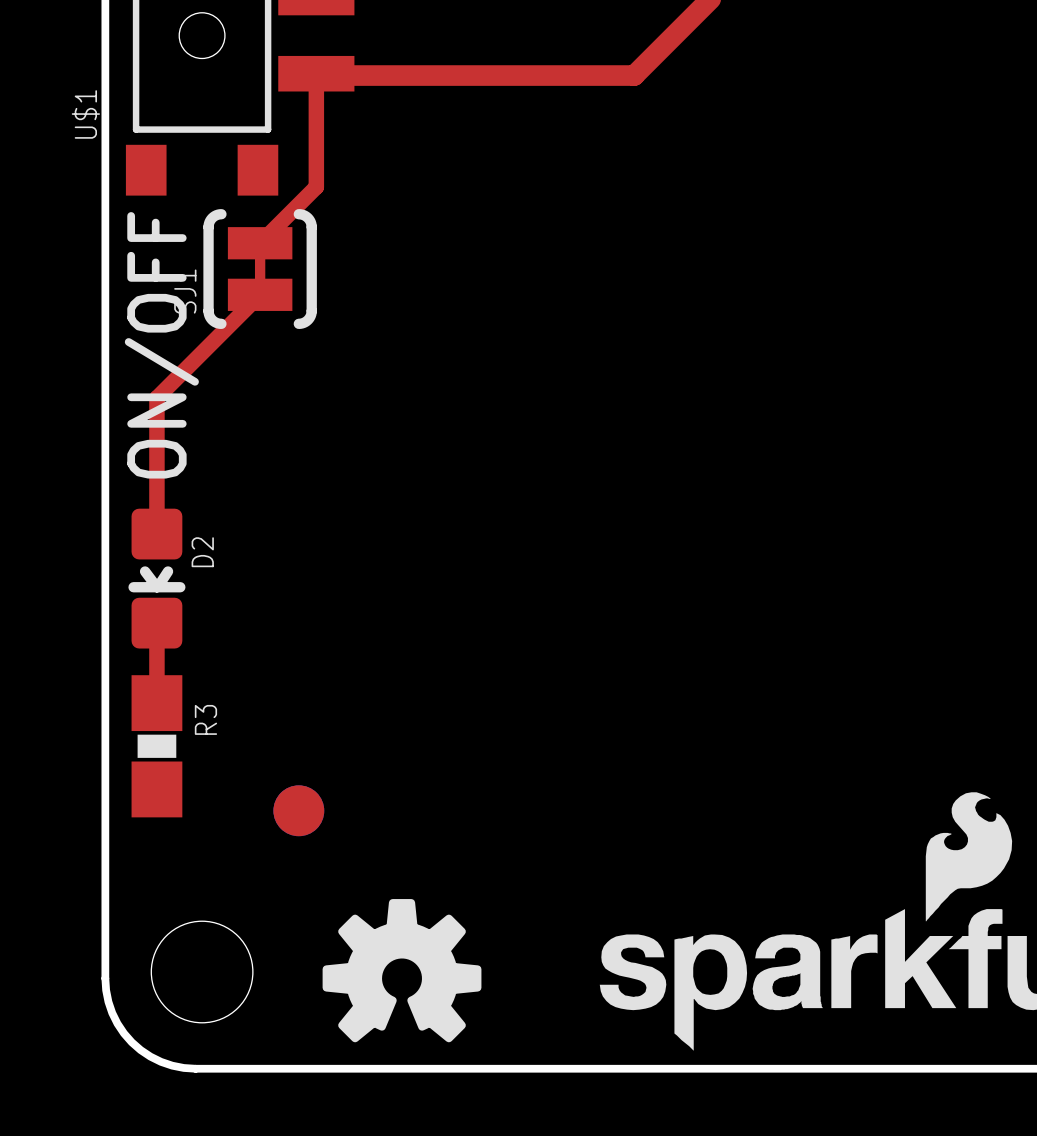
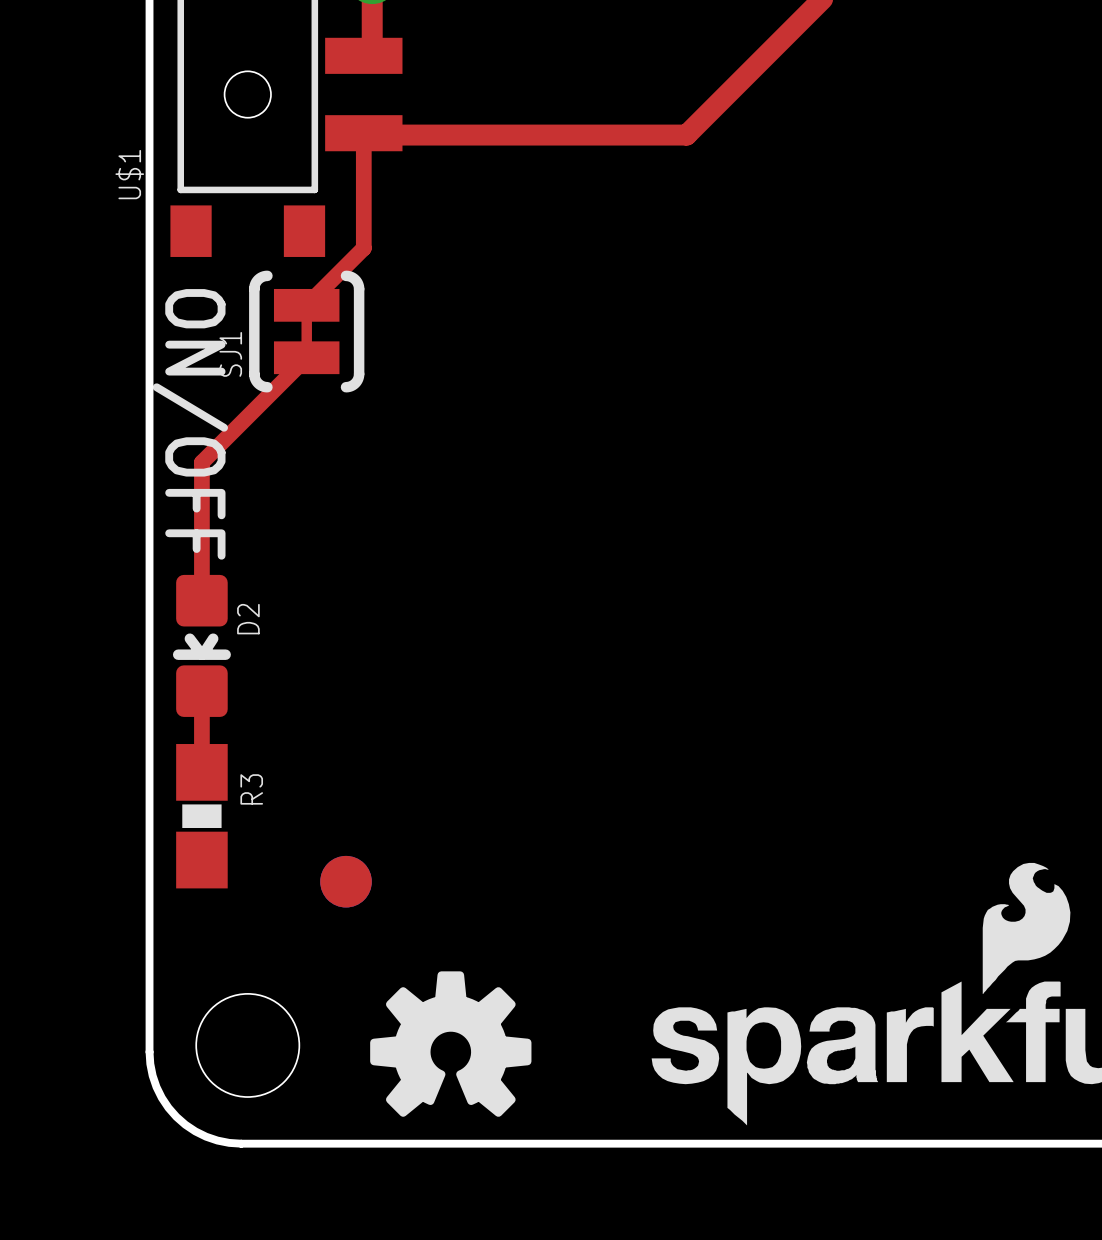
text rotation: 0° (161, 345) -> 180° (190, 424)

